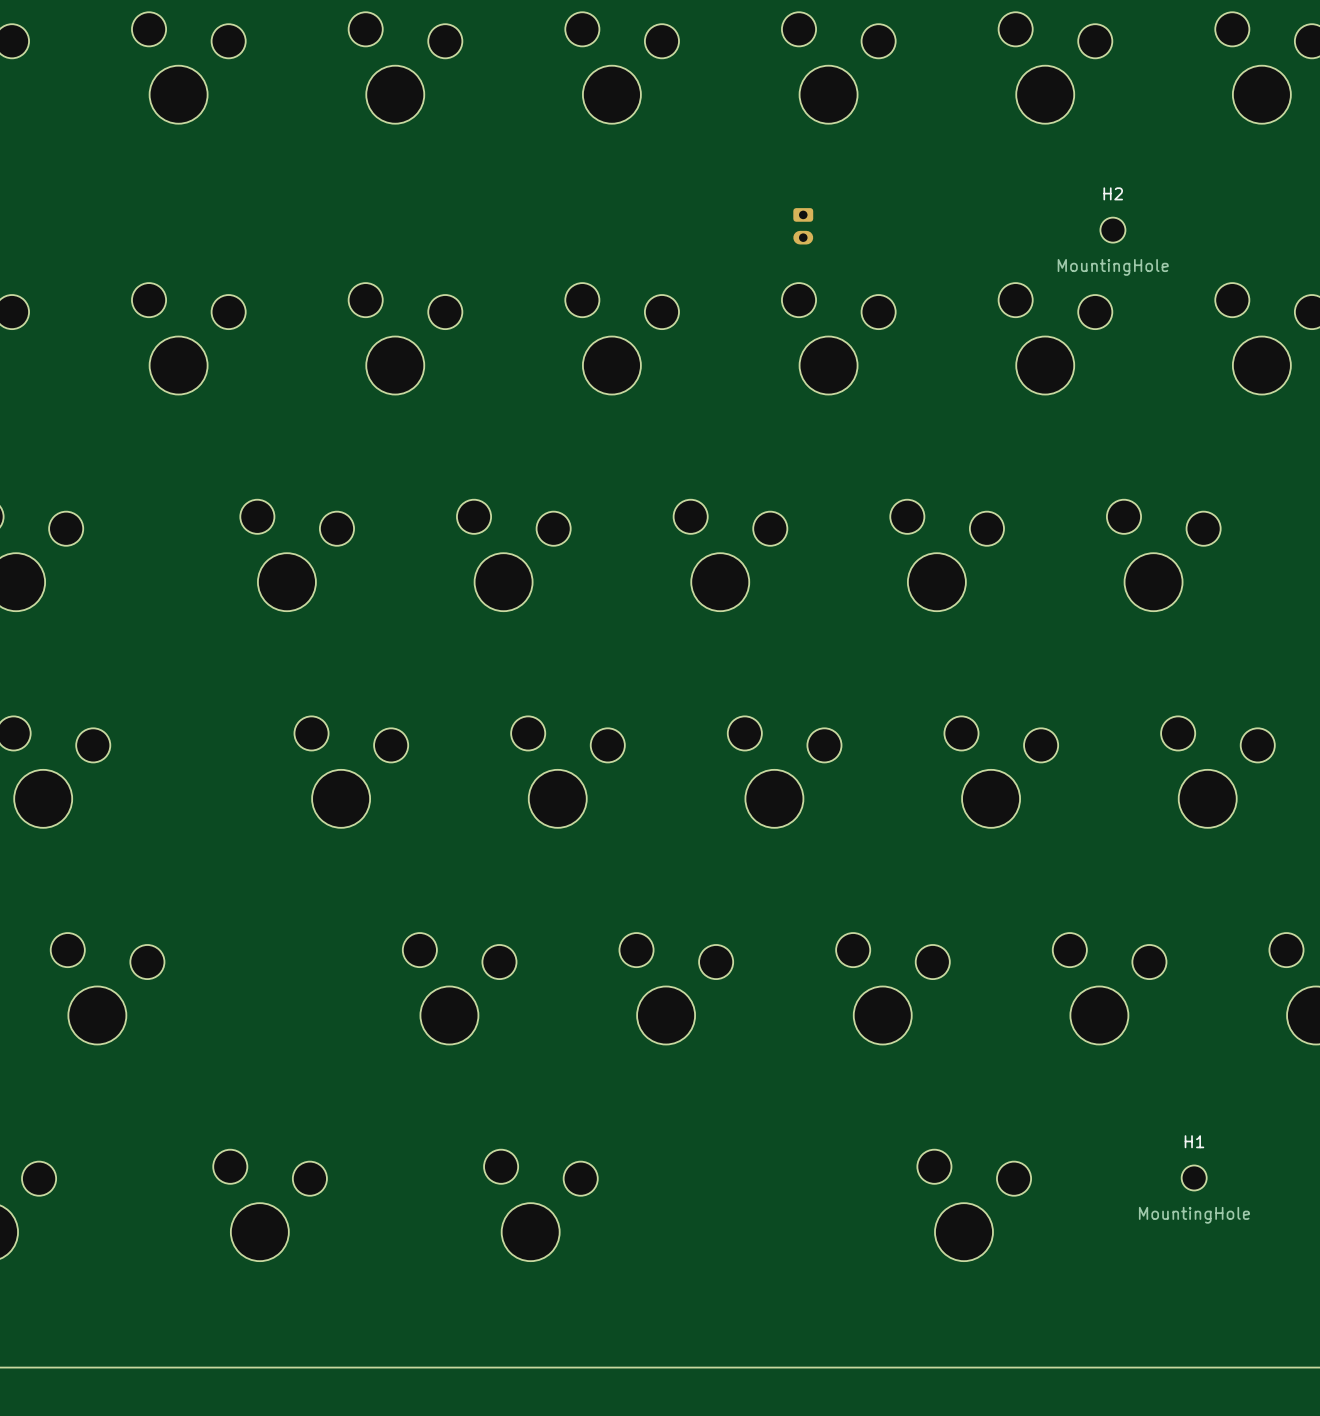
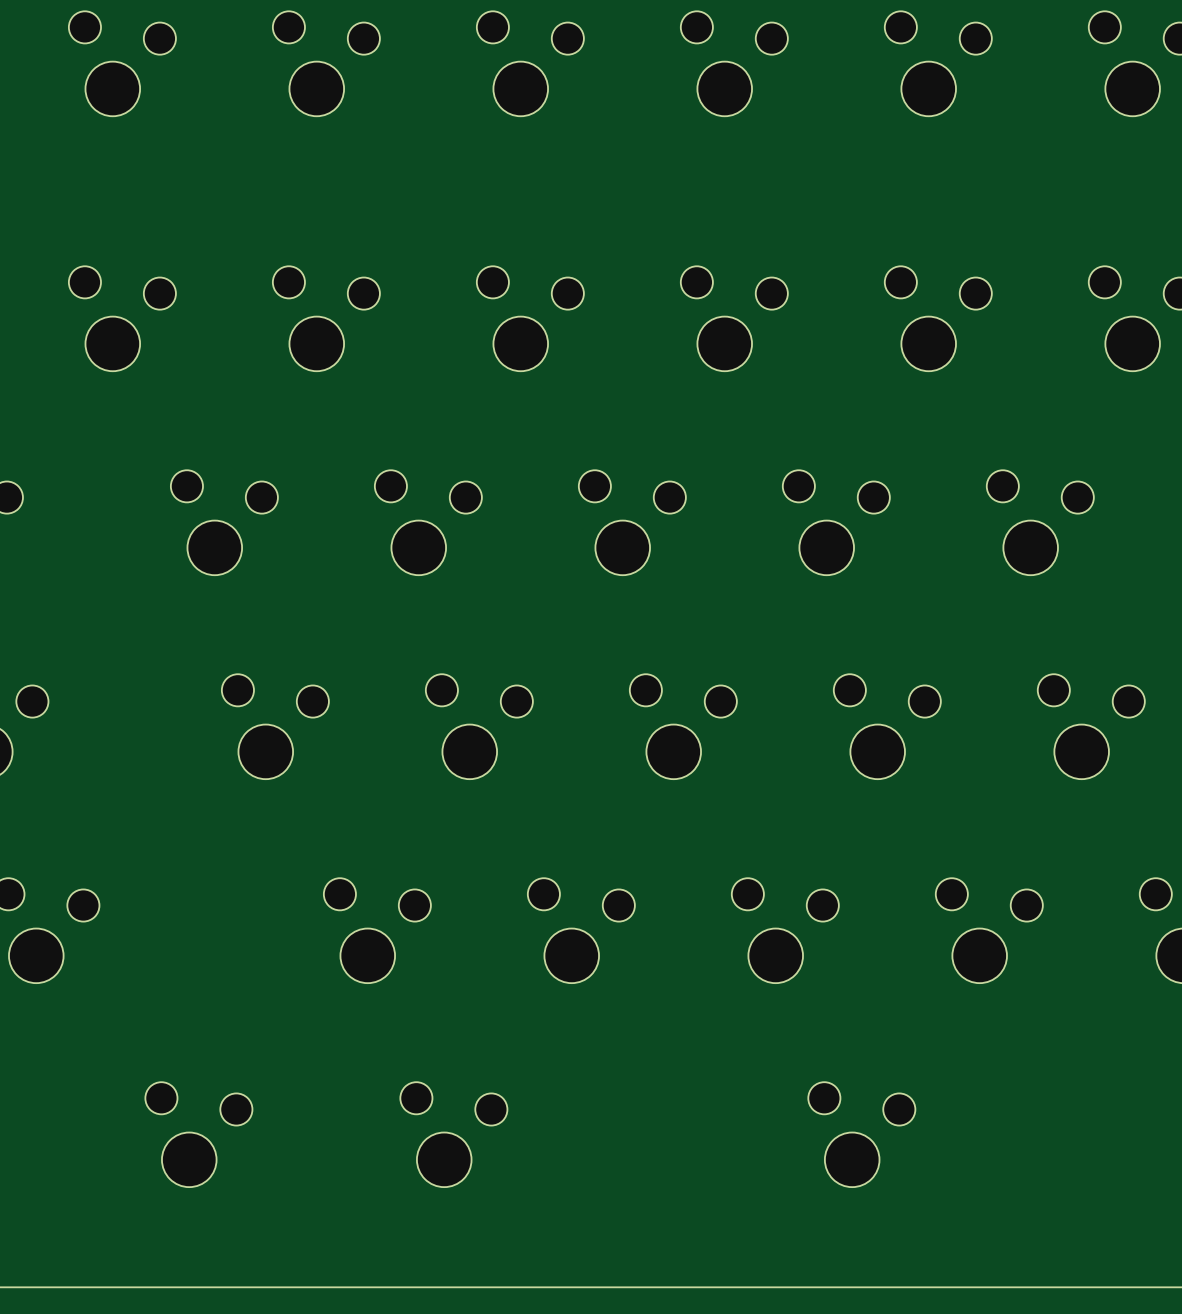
part: (803, 226) -> none
H2: MountingHole (1112, 230) -> none
H1: MountingHole (1194, 1177) -> none

